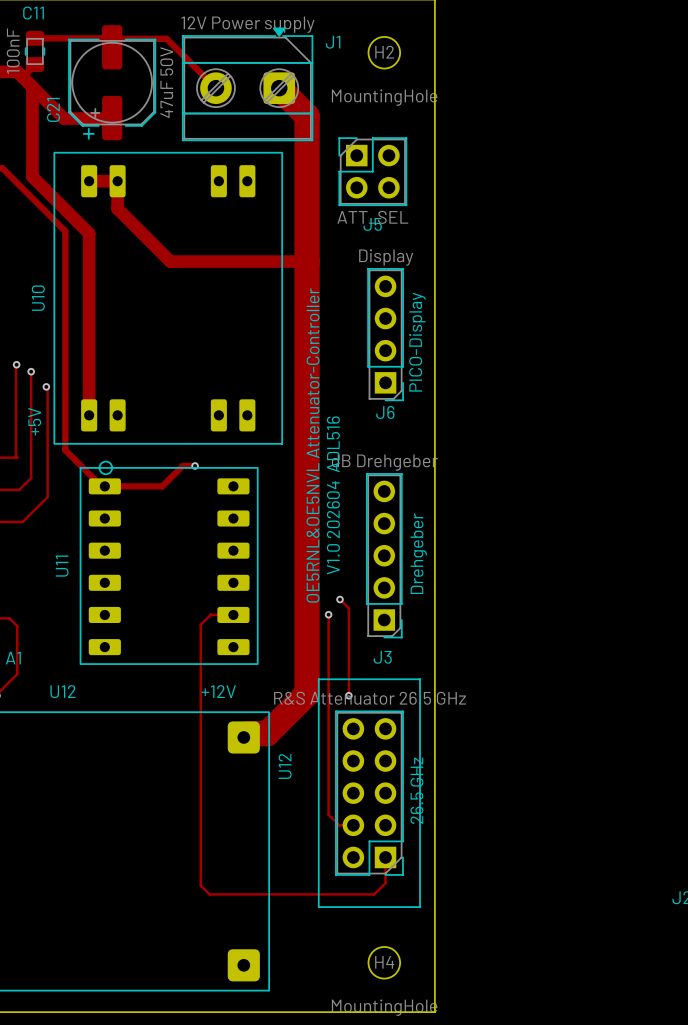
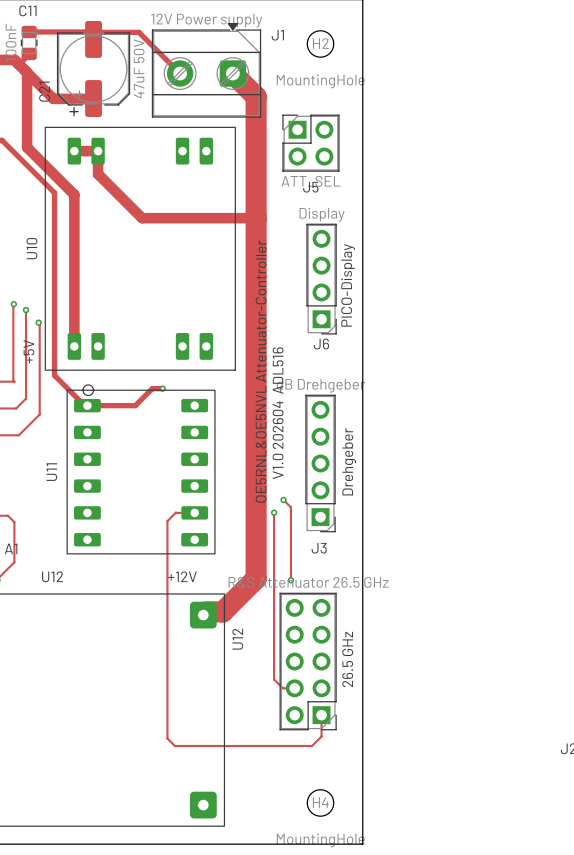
line: (318, 679) (420, 679) (420, 907) (318, 907) (318, 679) -> none

